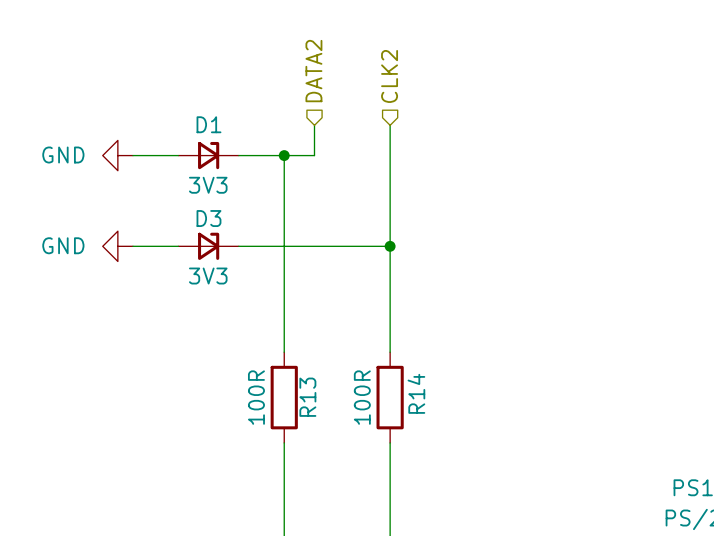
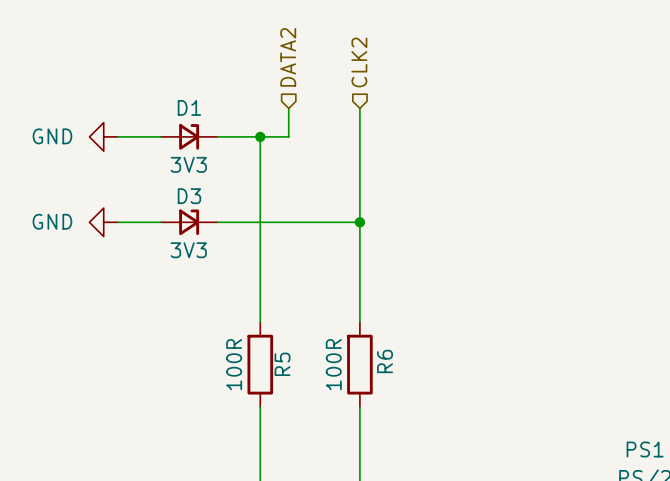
R14 name: R14 (416, 393) -> R6 (385, 361)
R13 name: R13 (307, 397) -> R5 (282, 364)

